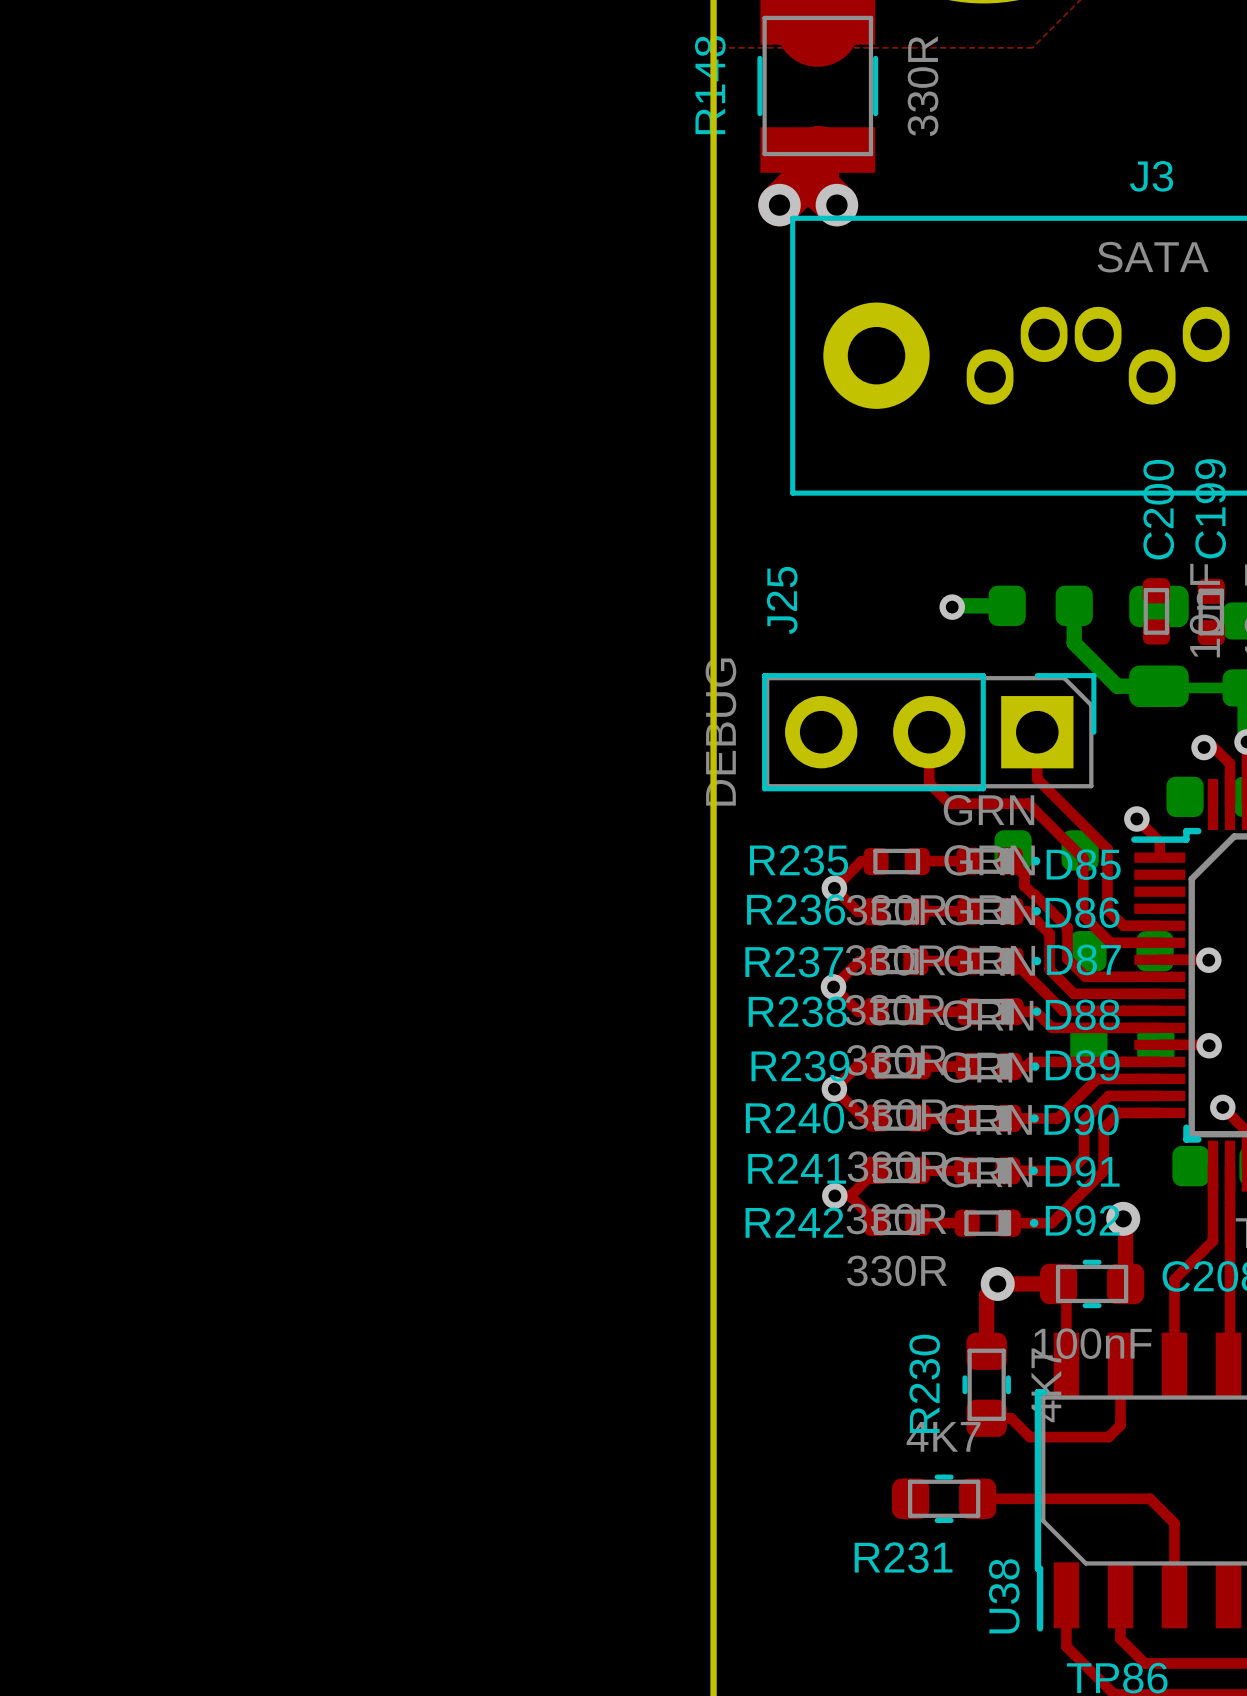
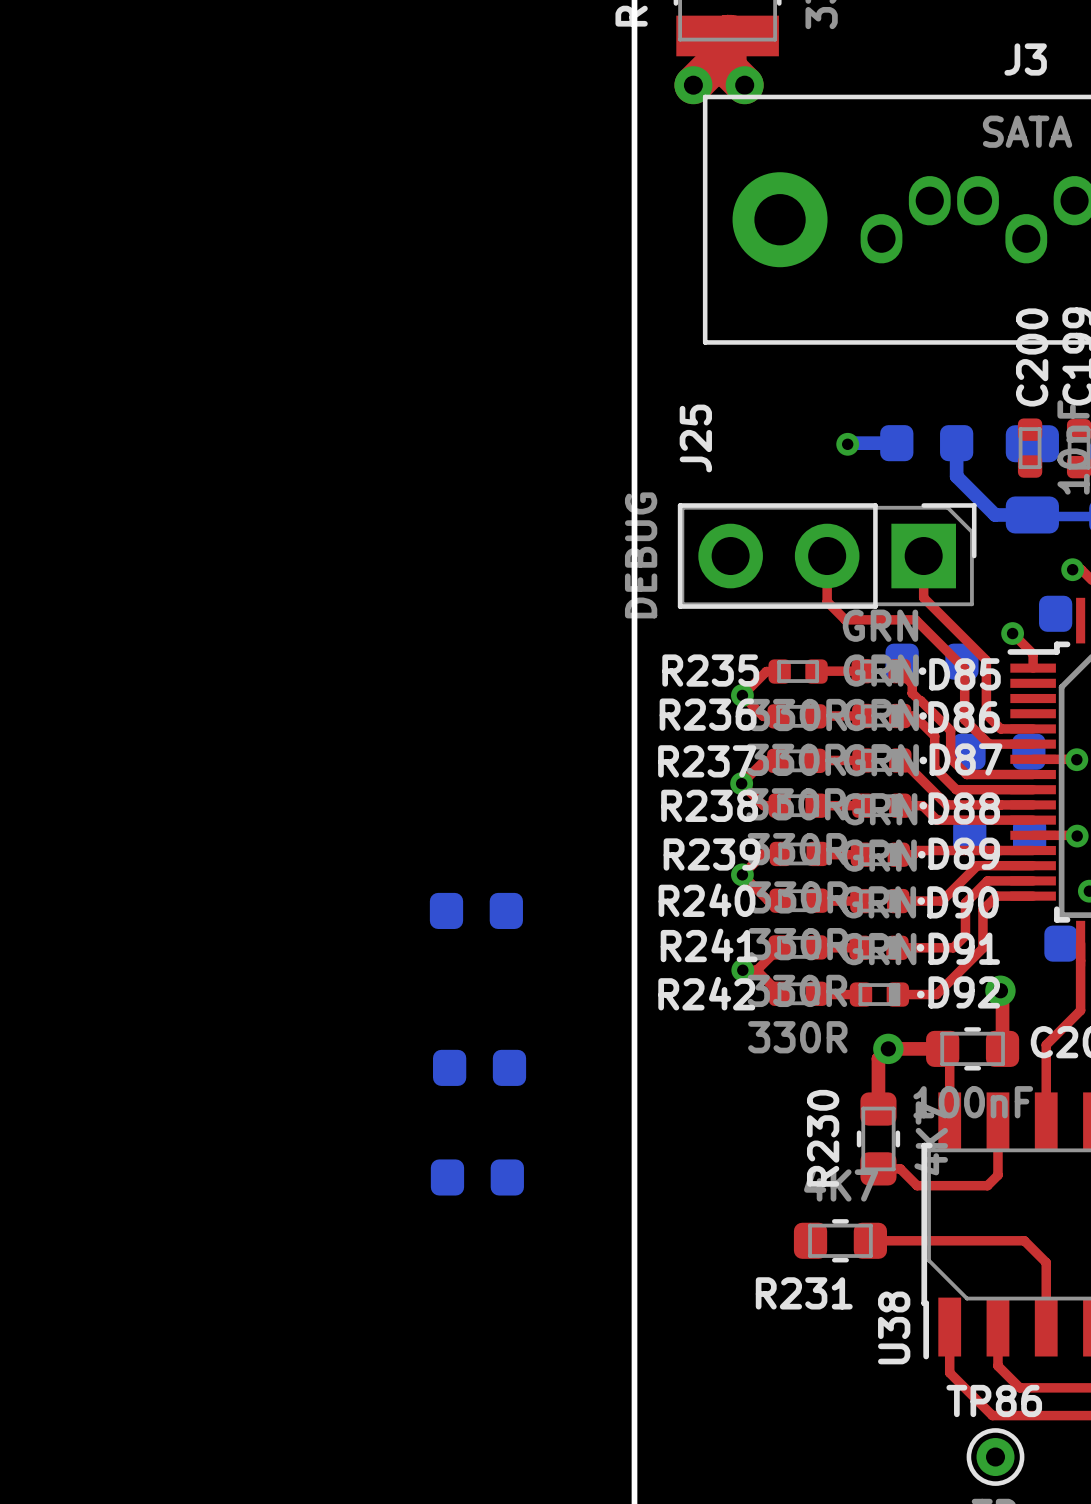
part: none -> (476, 910)
part: none -> (479, 1067)
part: none -> (477, 1177)

